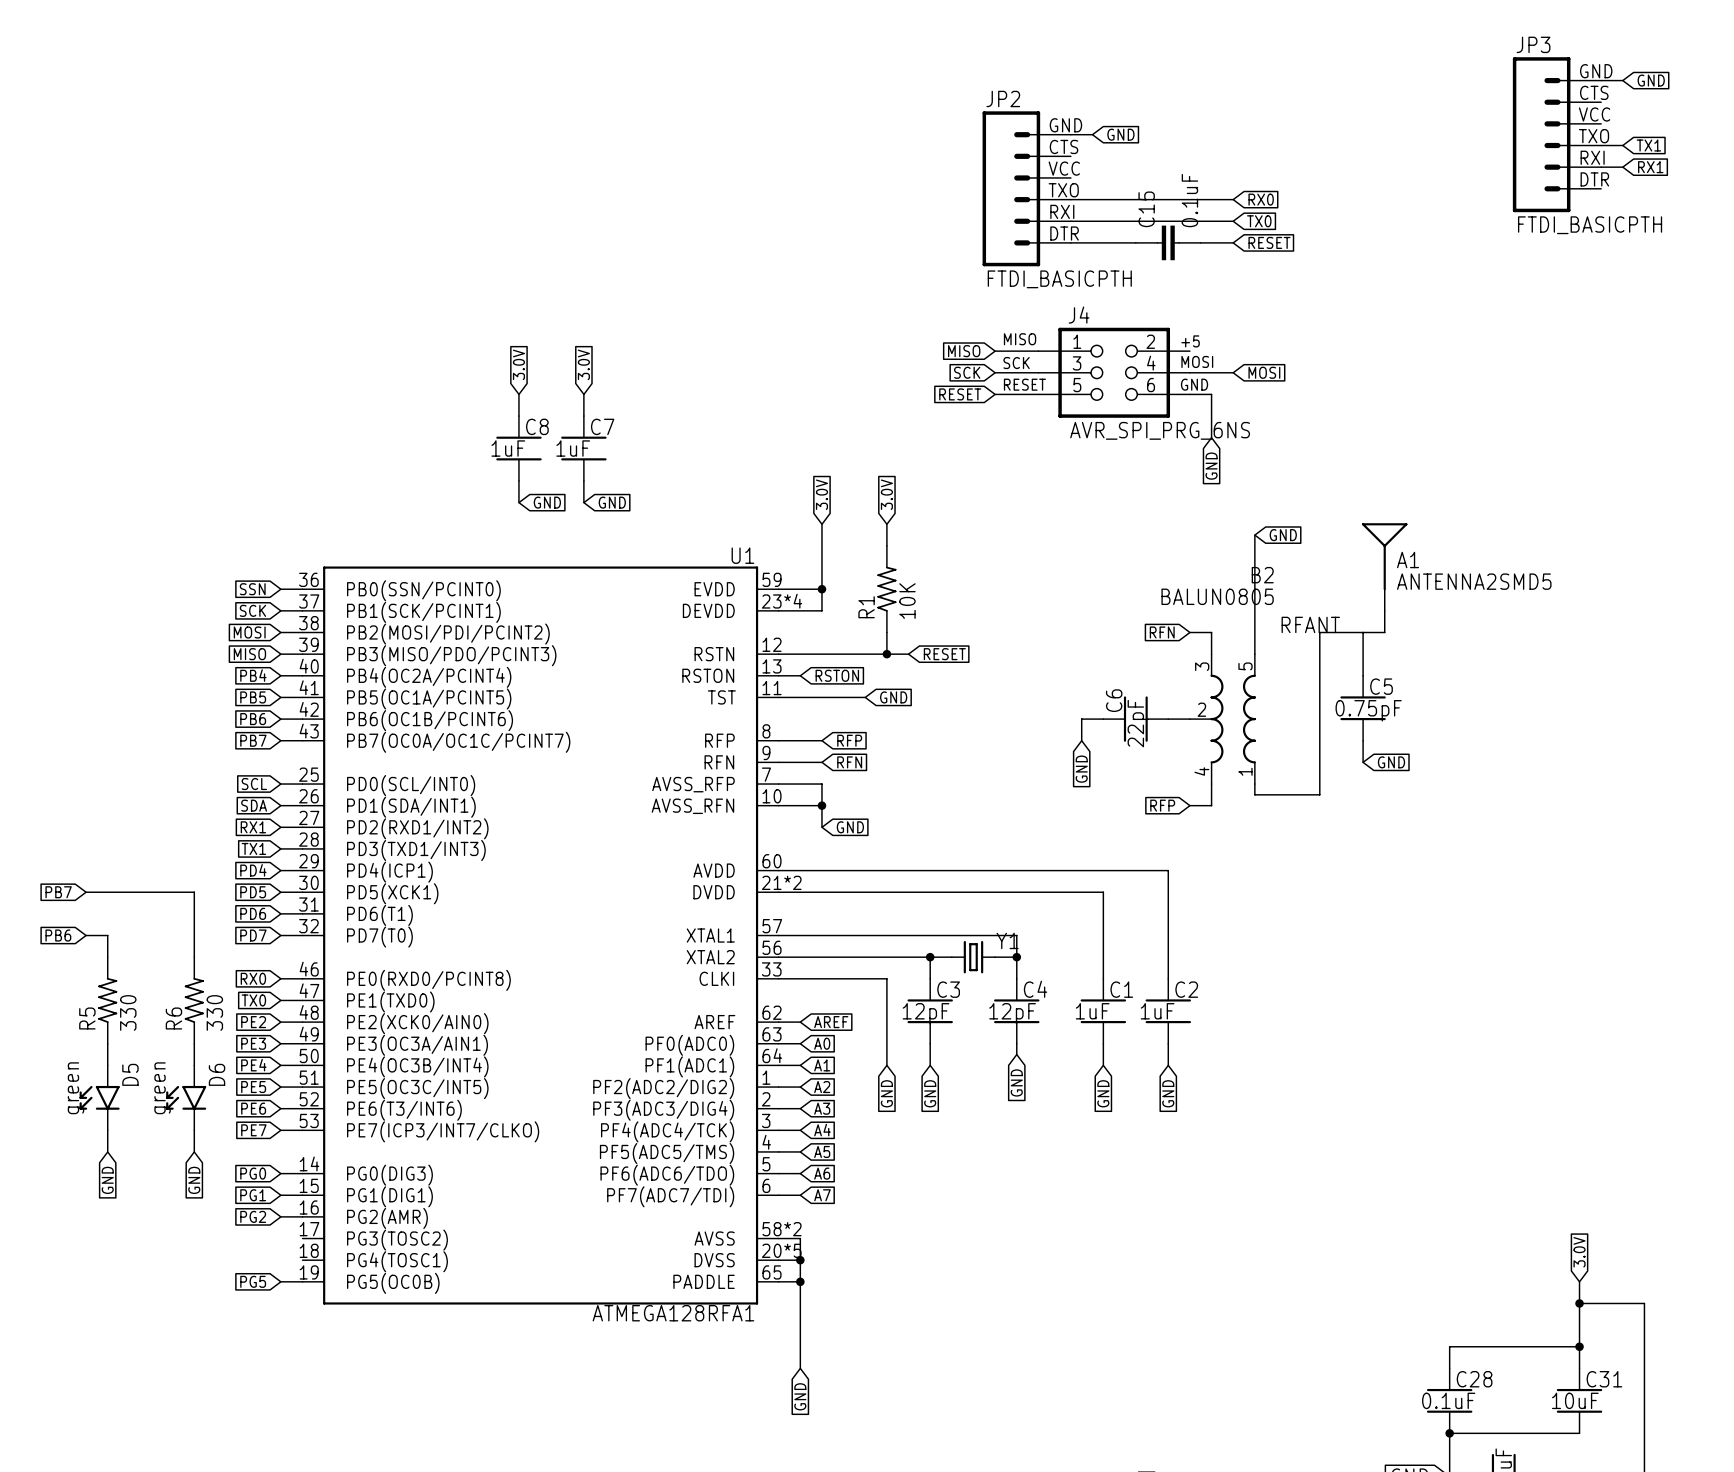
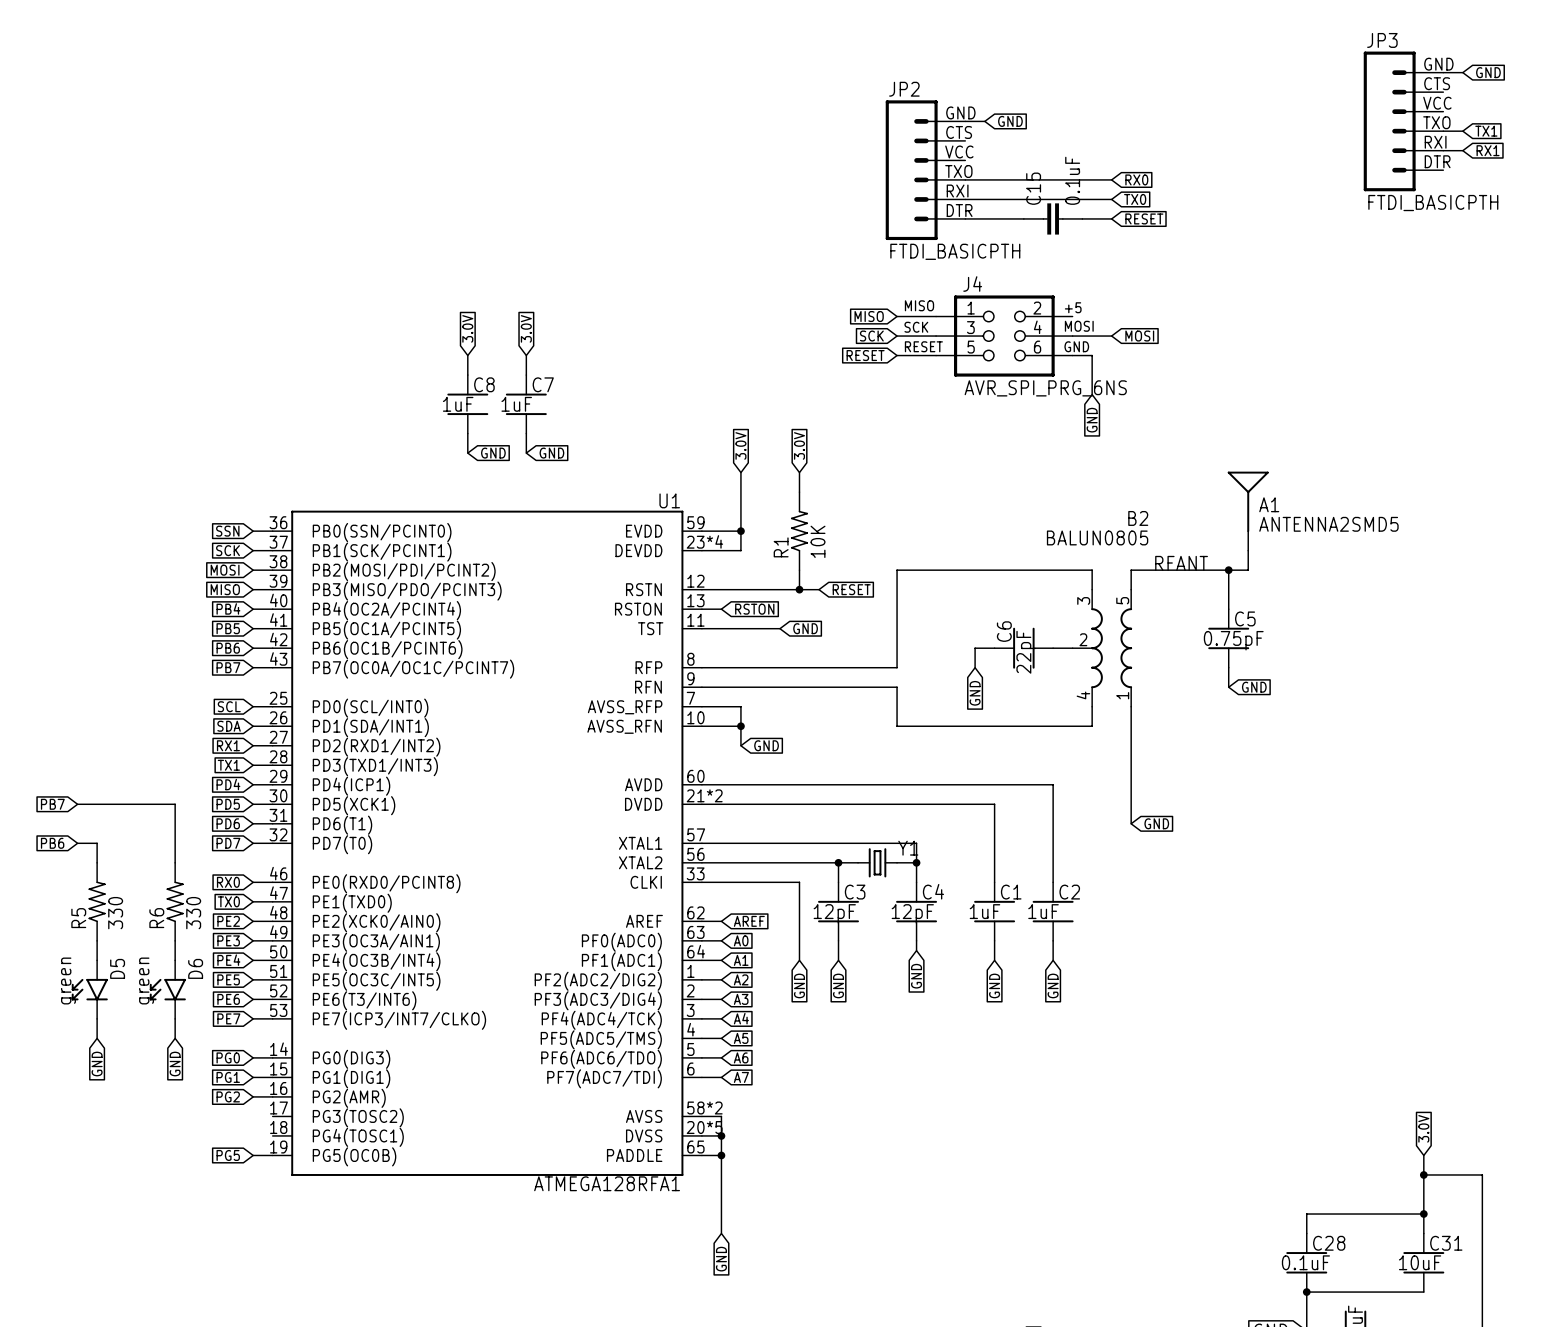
wire: (1254, 535) (1254, 632) -> (1189, 570) (1131, 570)
global label: GND (1283, 535) -> none
global label: RFN (1162, 632) -> none
wire: none -> (1072, 570) (897, 570) (897, 667) (740, 667)
wire: (1319, 632) (1319, 794) (1254, 794) -> (1131, 823) (1131, 716)
junction: none -> (1228, 570)
global label: RFP (849, 740) -> none
wire: none -> (740, 687) (897, 687) (897, 726) (1072, 726)
global label: RFN (849, 762) -> none
global label: RFP (1162, 805) -> none
global label: none -> GND (1156, 823)

